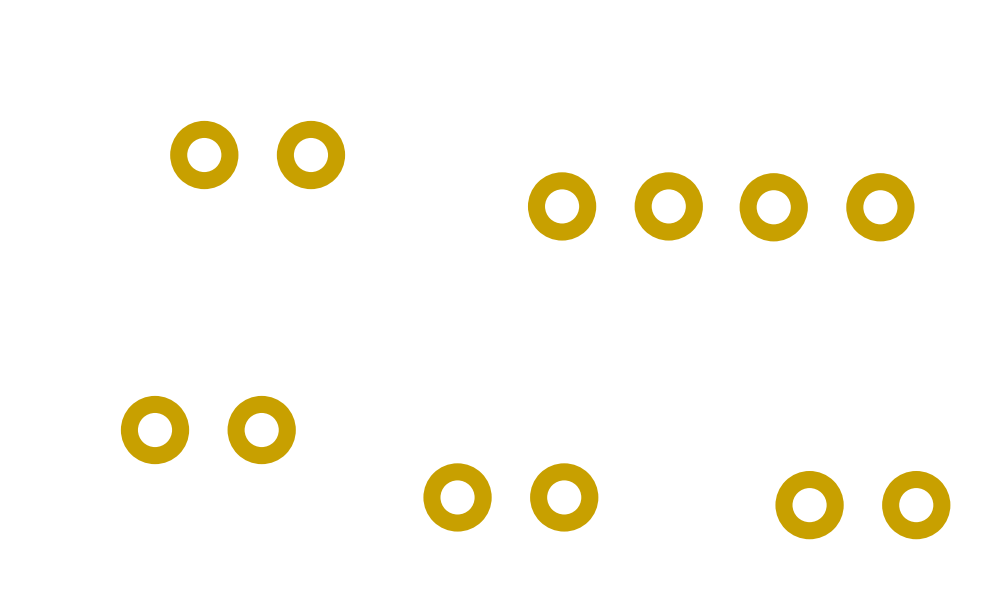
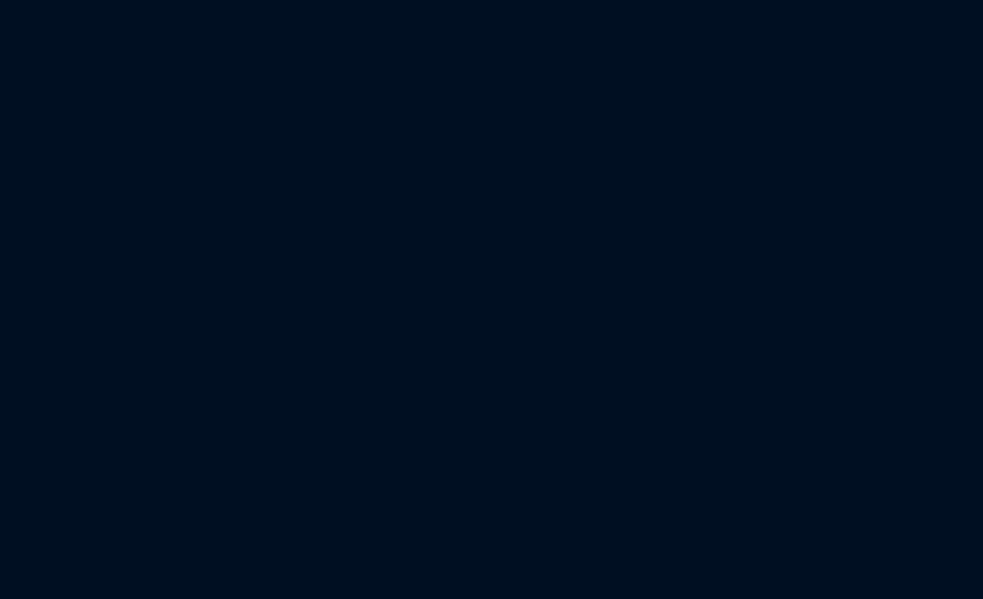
part: (257, 155) -> none
part: (615, 206) -> none
part: (827, 207) -> none
part: (208, 430) -> none
part: (510, 497) -> none
part: (862, 505) -> none

